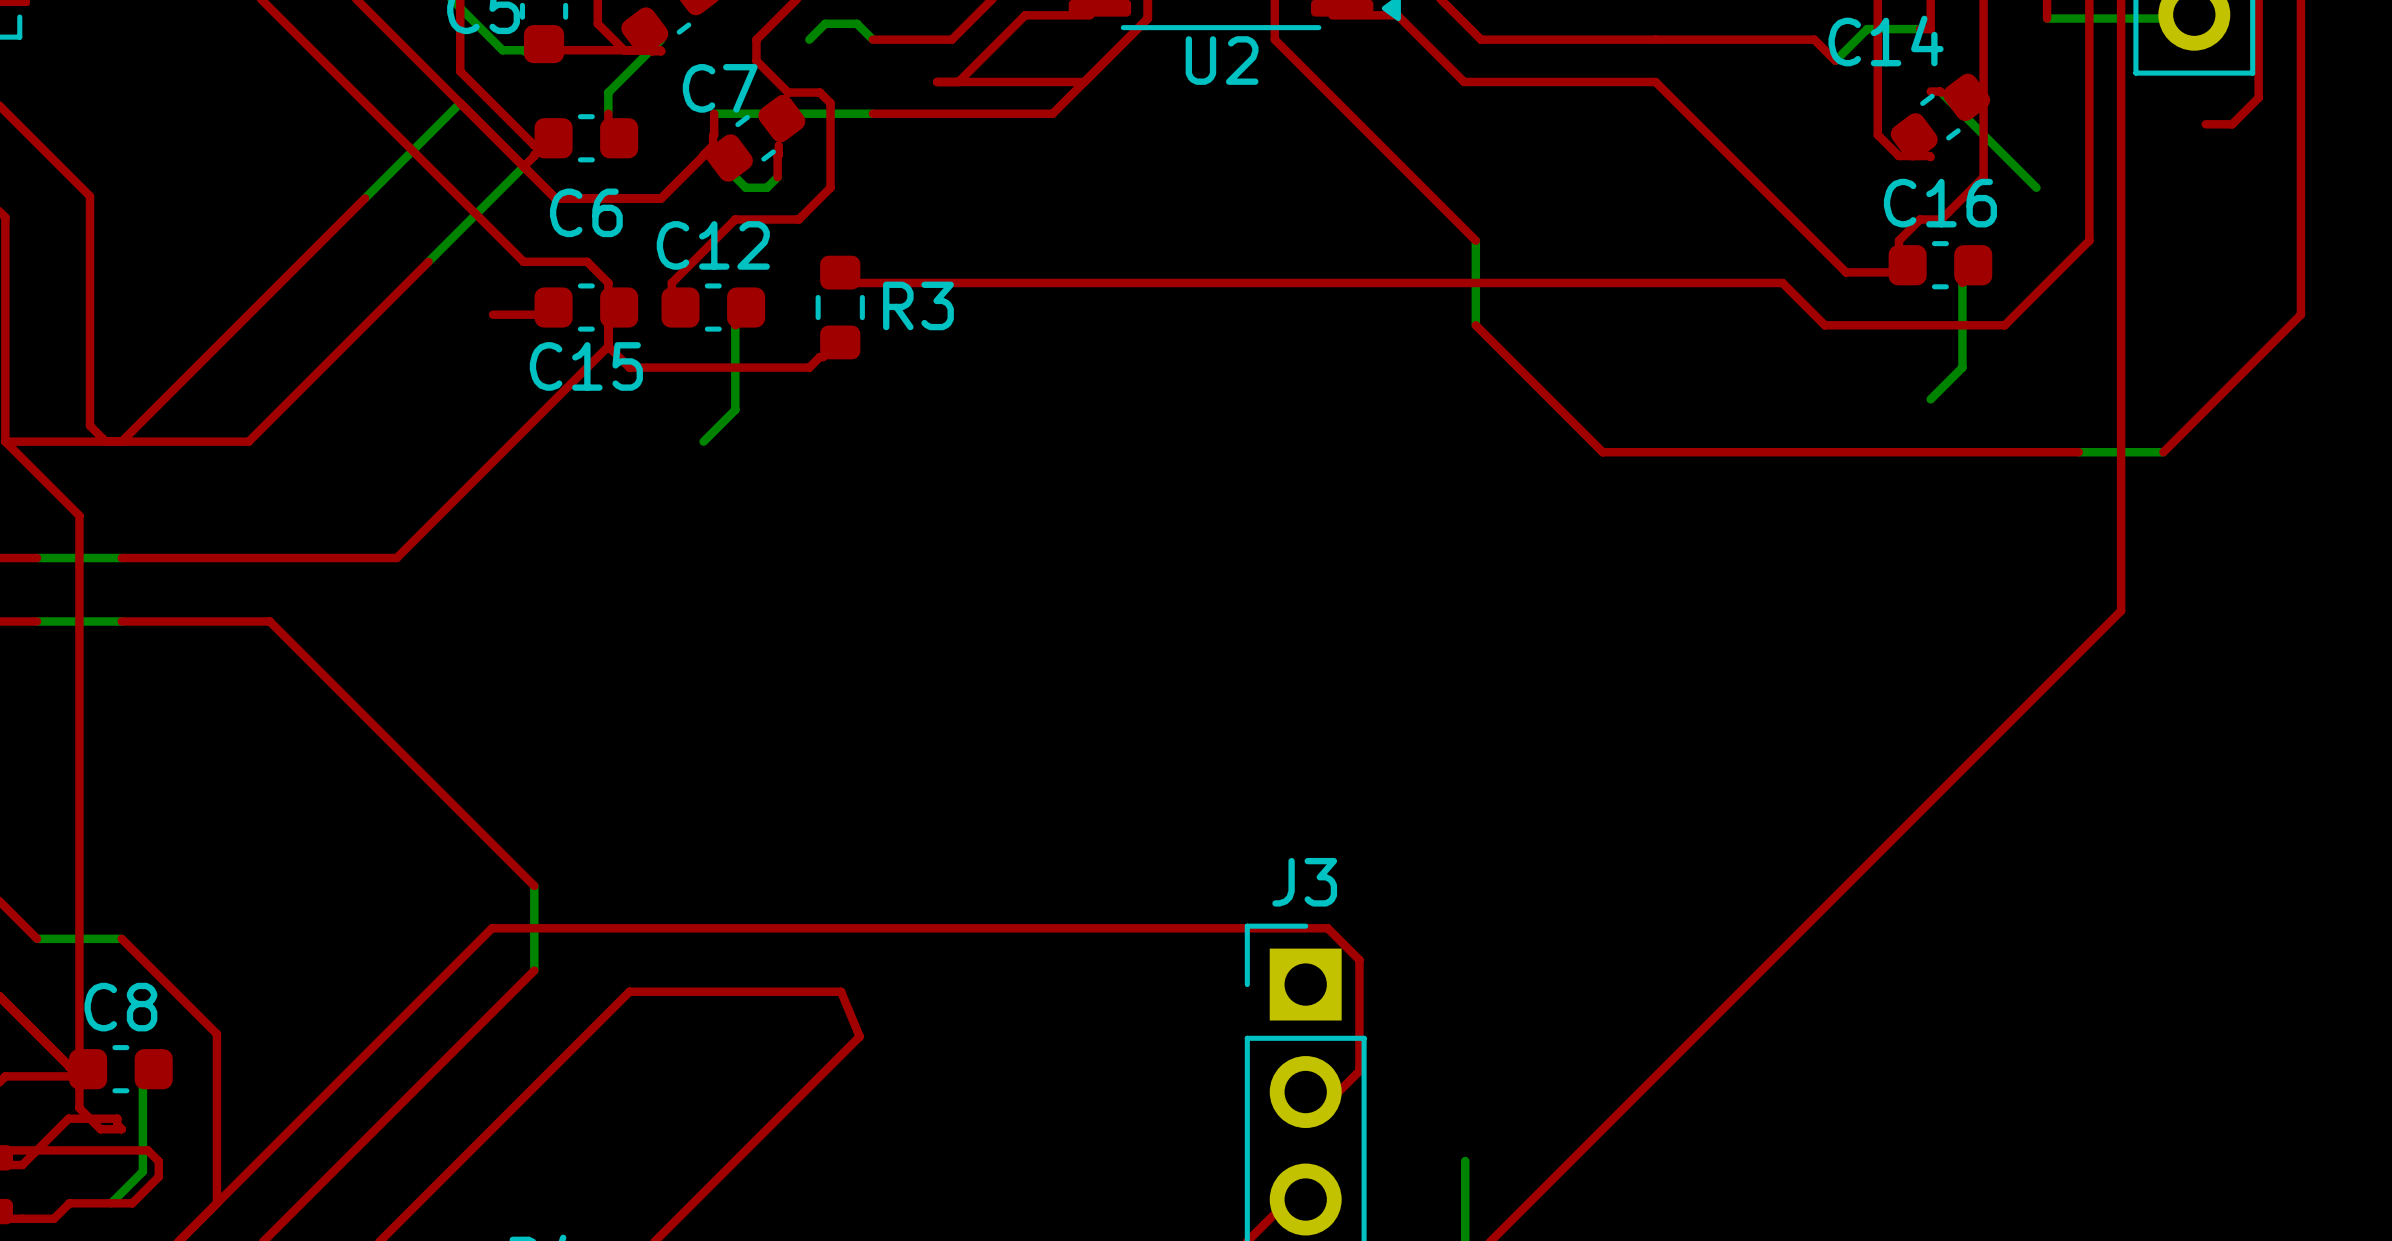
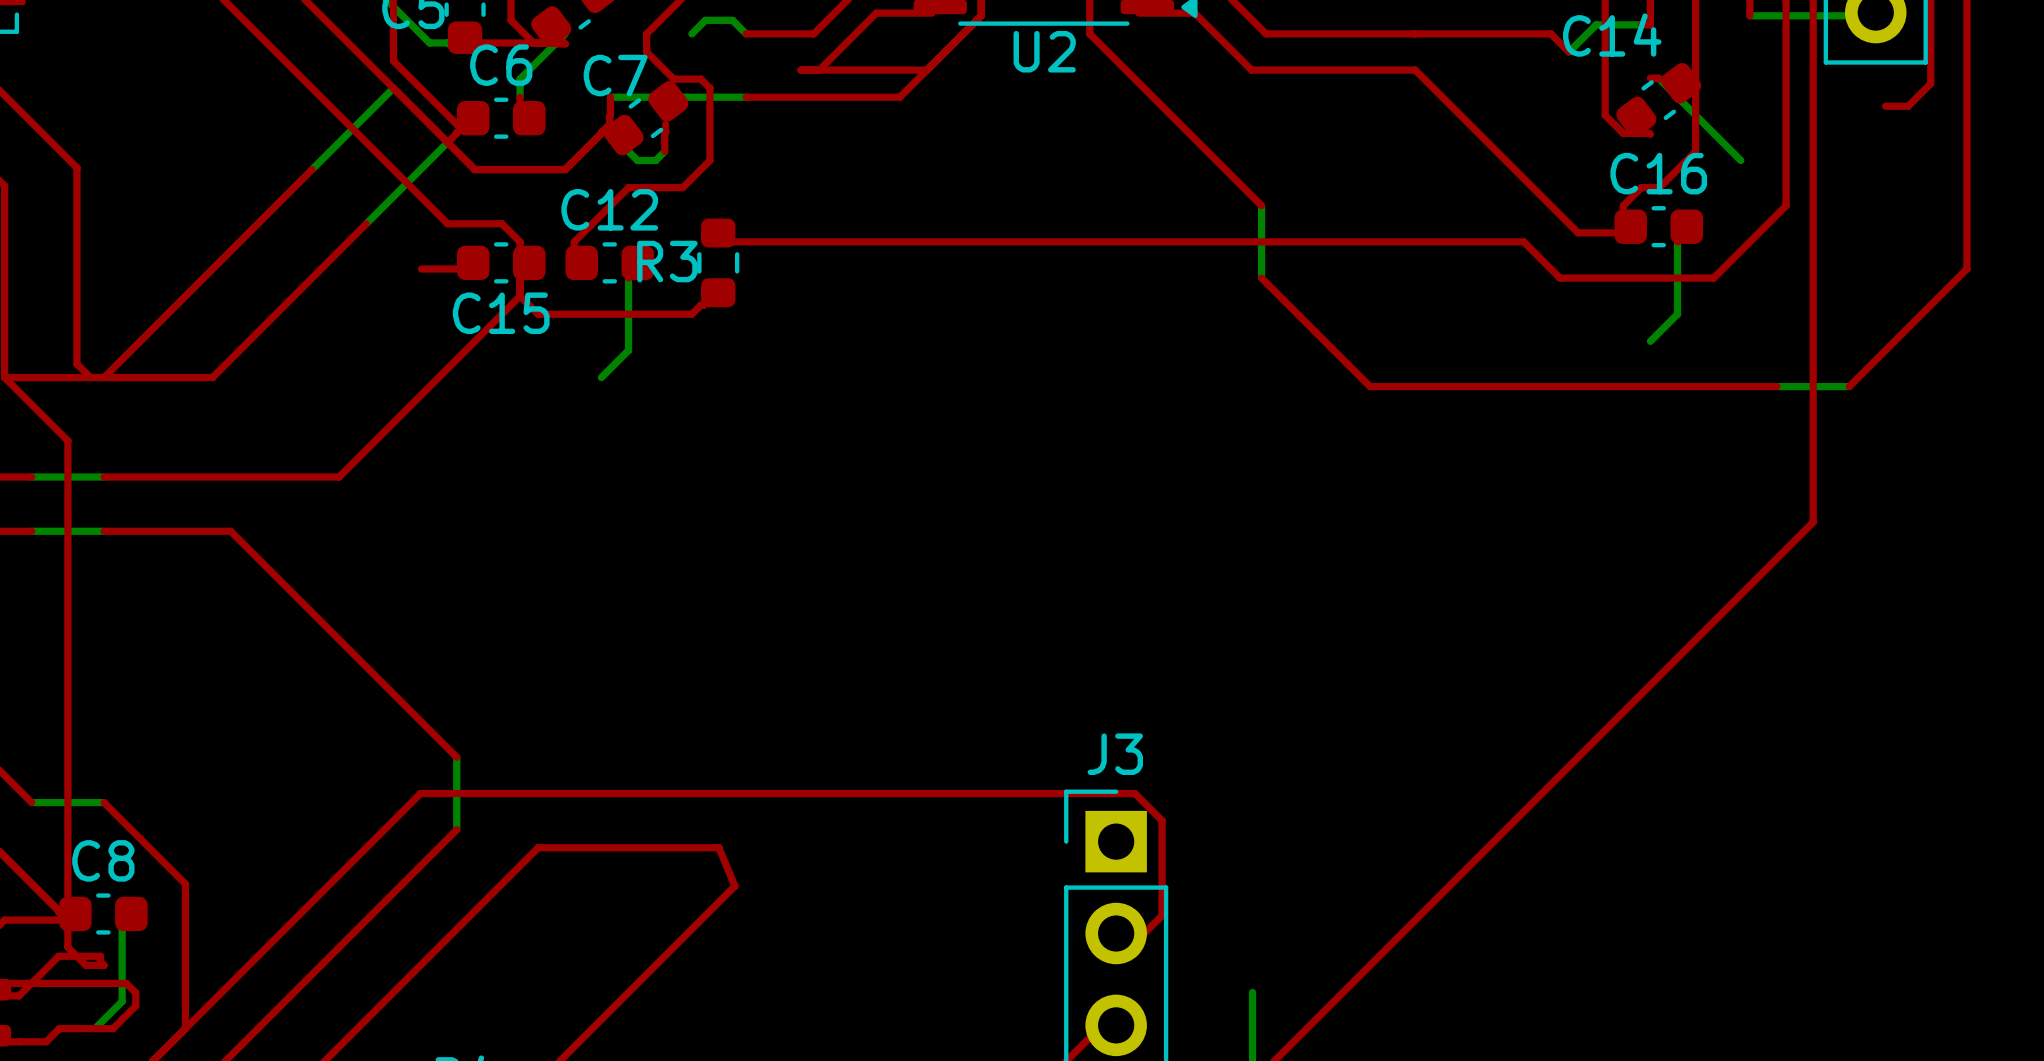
C6 name position: C6 (586, 212) -> C6 (501, 65)
R3 name position: R3 (918, 305) -> R3 (667, 261)

